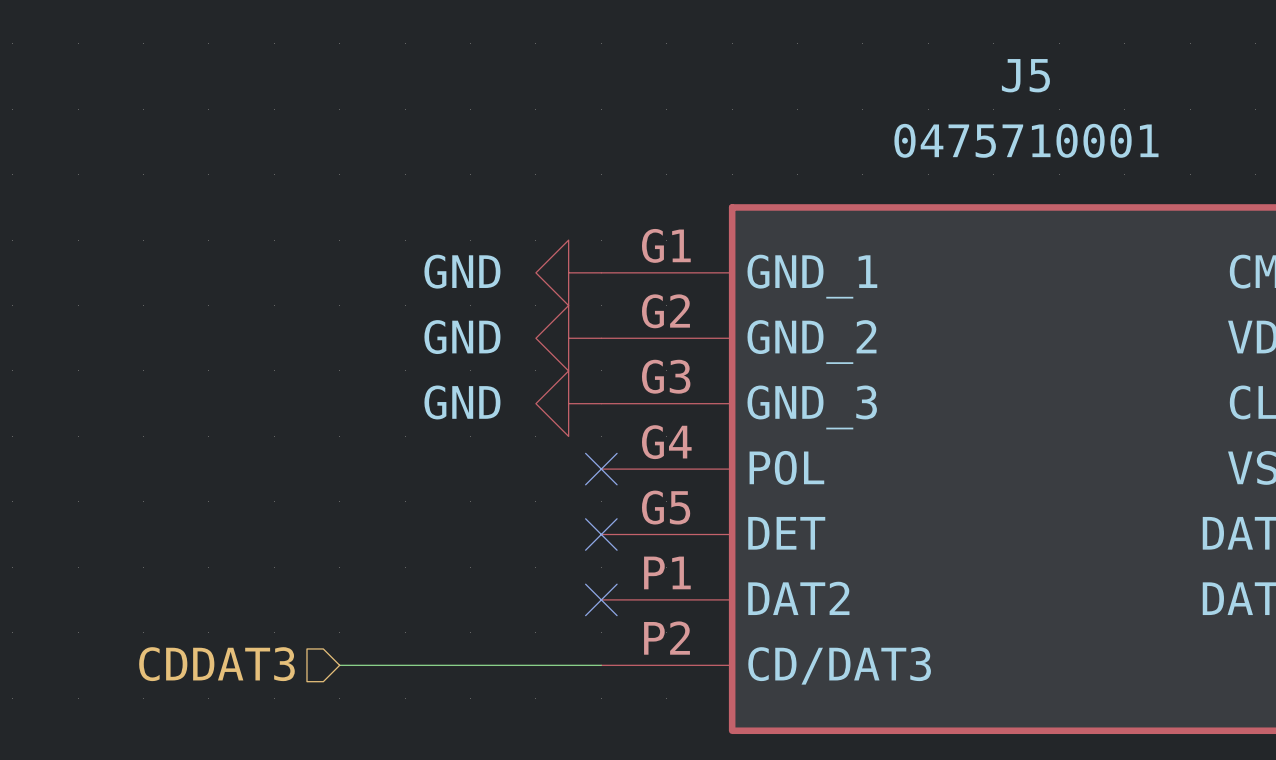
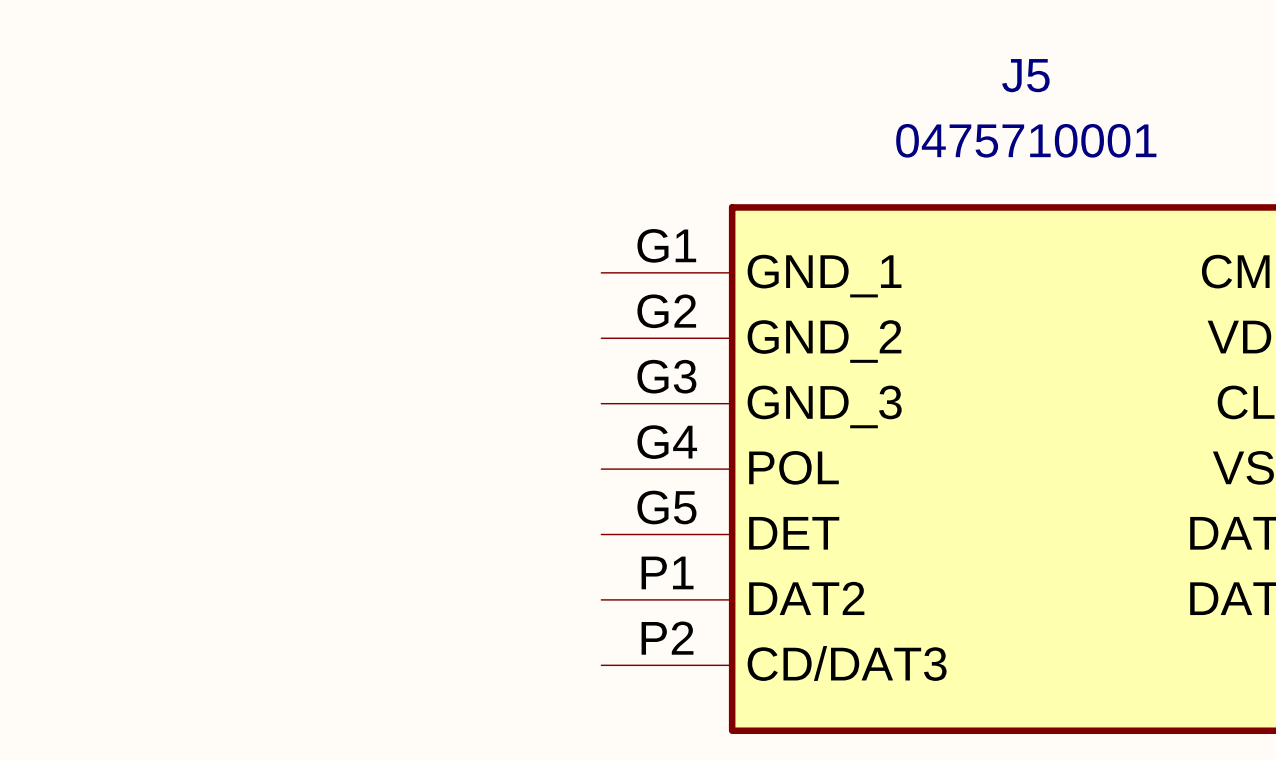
power symbol: GND (568, 272) -> none
power symbol: GND (568, 338) -> none
power symbol: GND (568, 403) -> none
no-connect mark: (601, 469) -> none
no-connect mark: (601, 534) -> none
no-connect mark: (601, 599) -> none
hierarchical label: CDDAT3 (216, 664) -> none
wire: (339, 665) (601, 665) -> none

